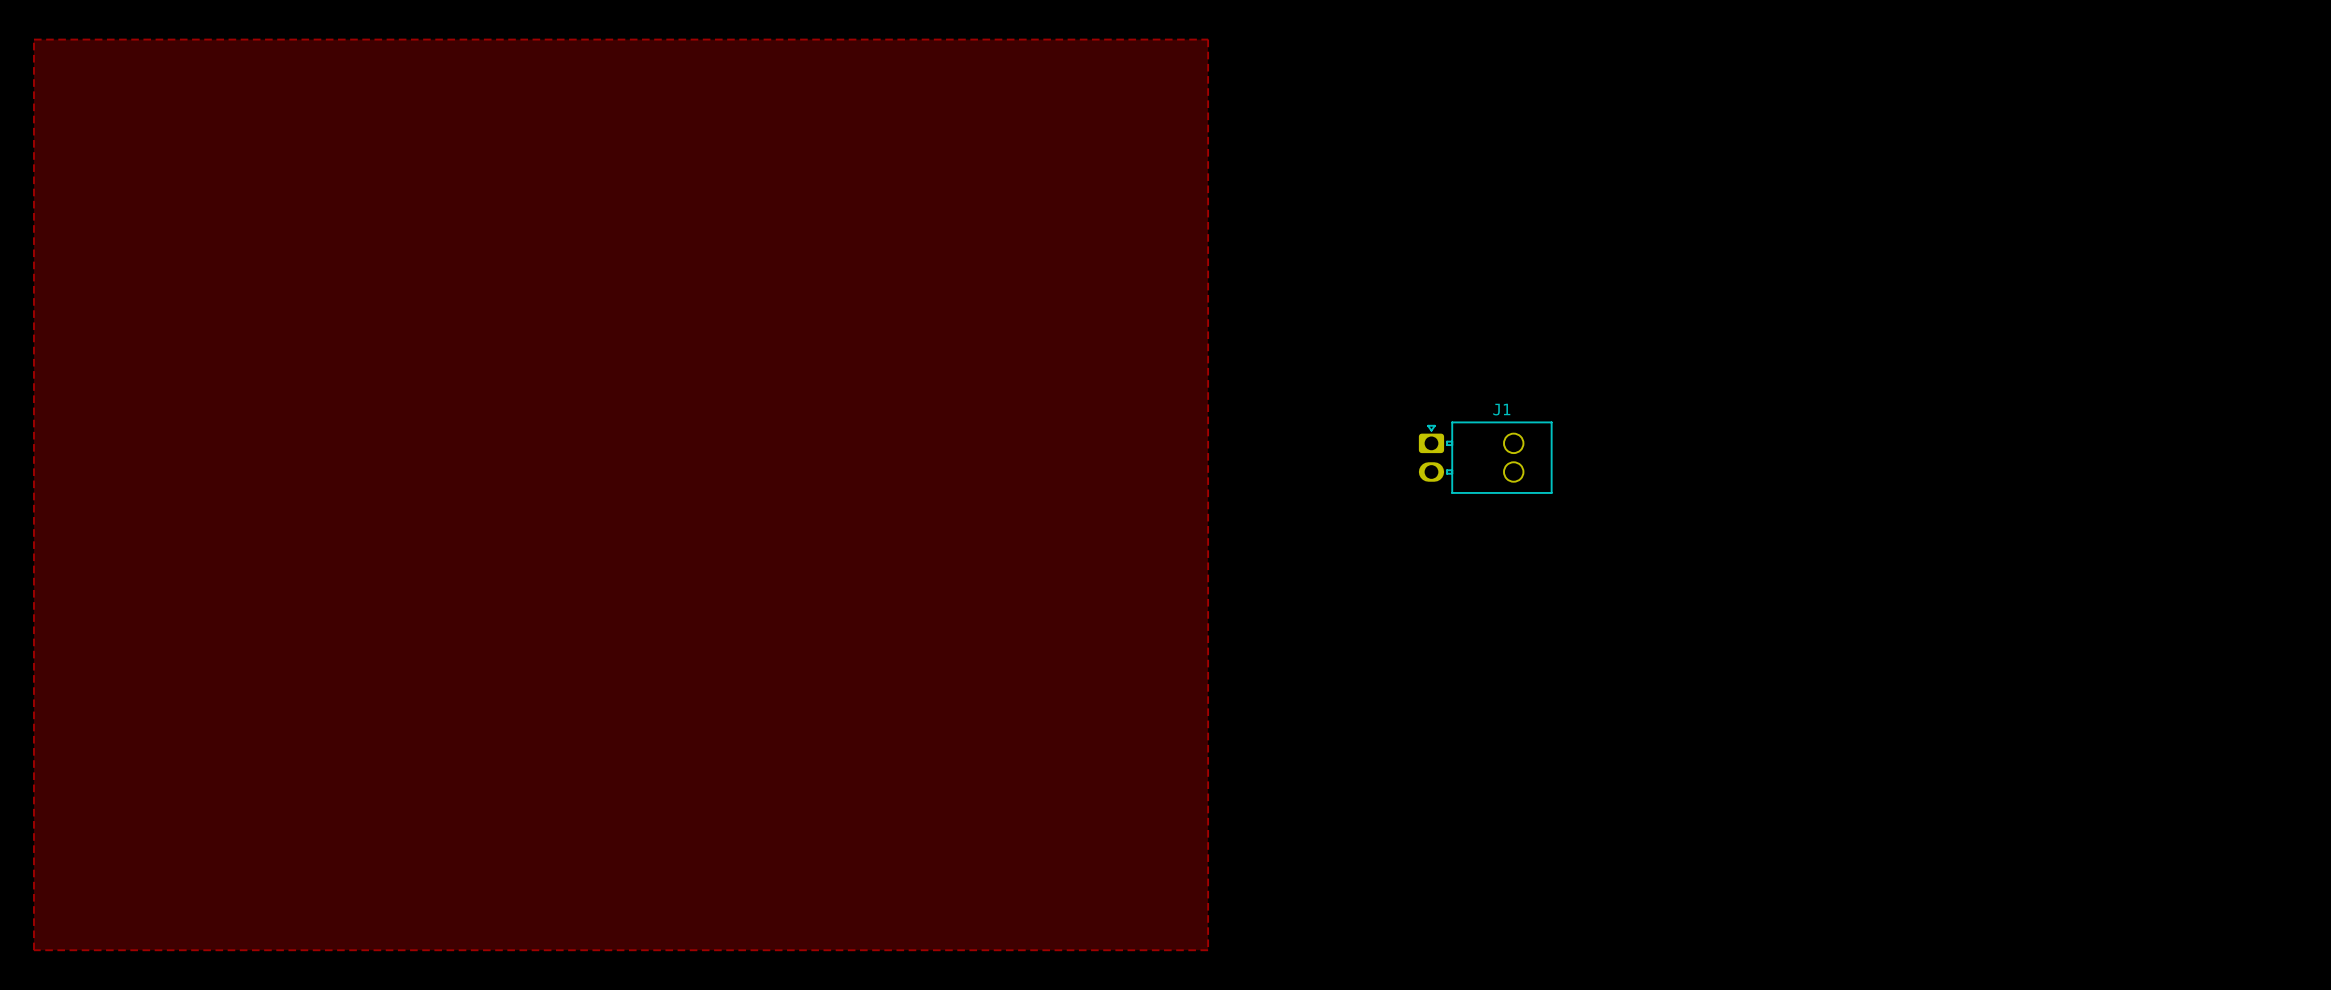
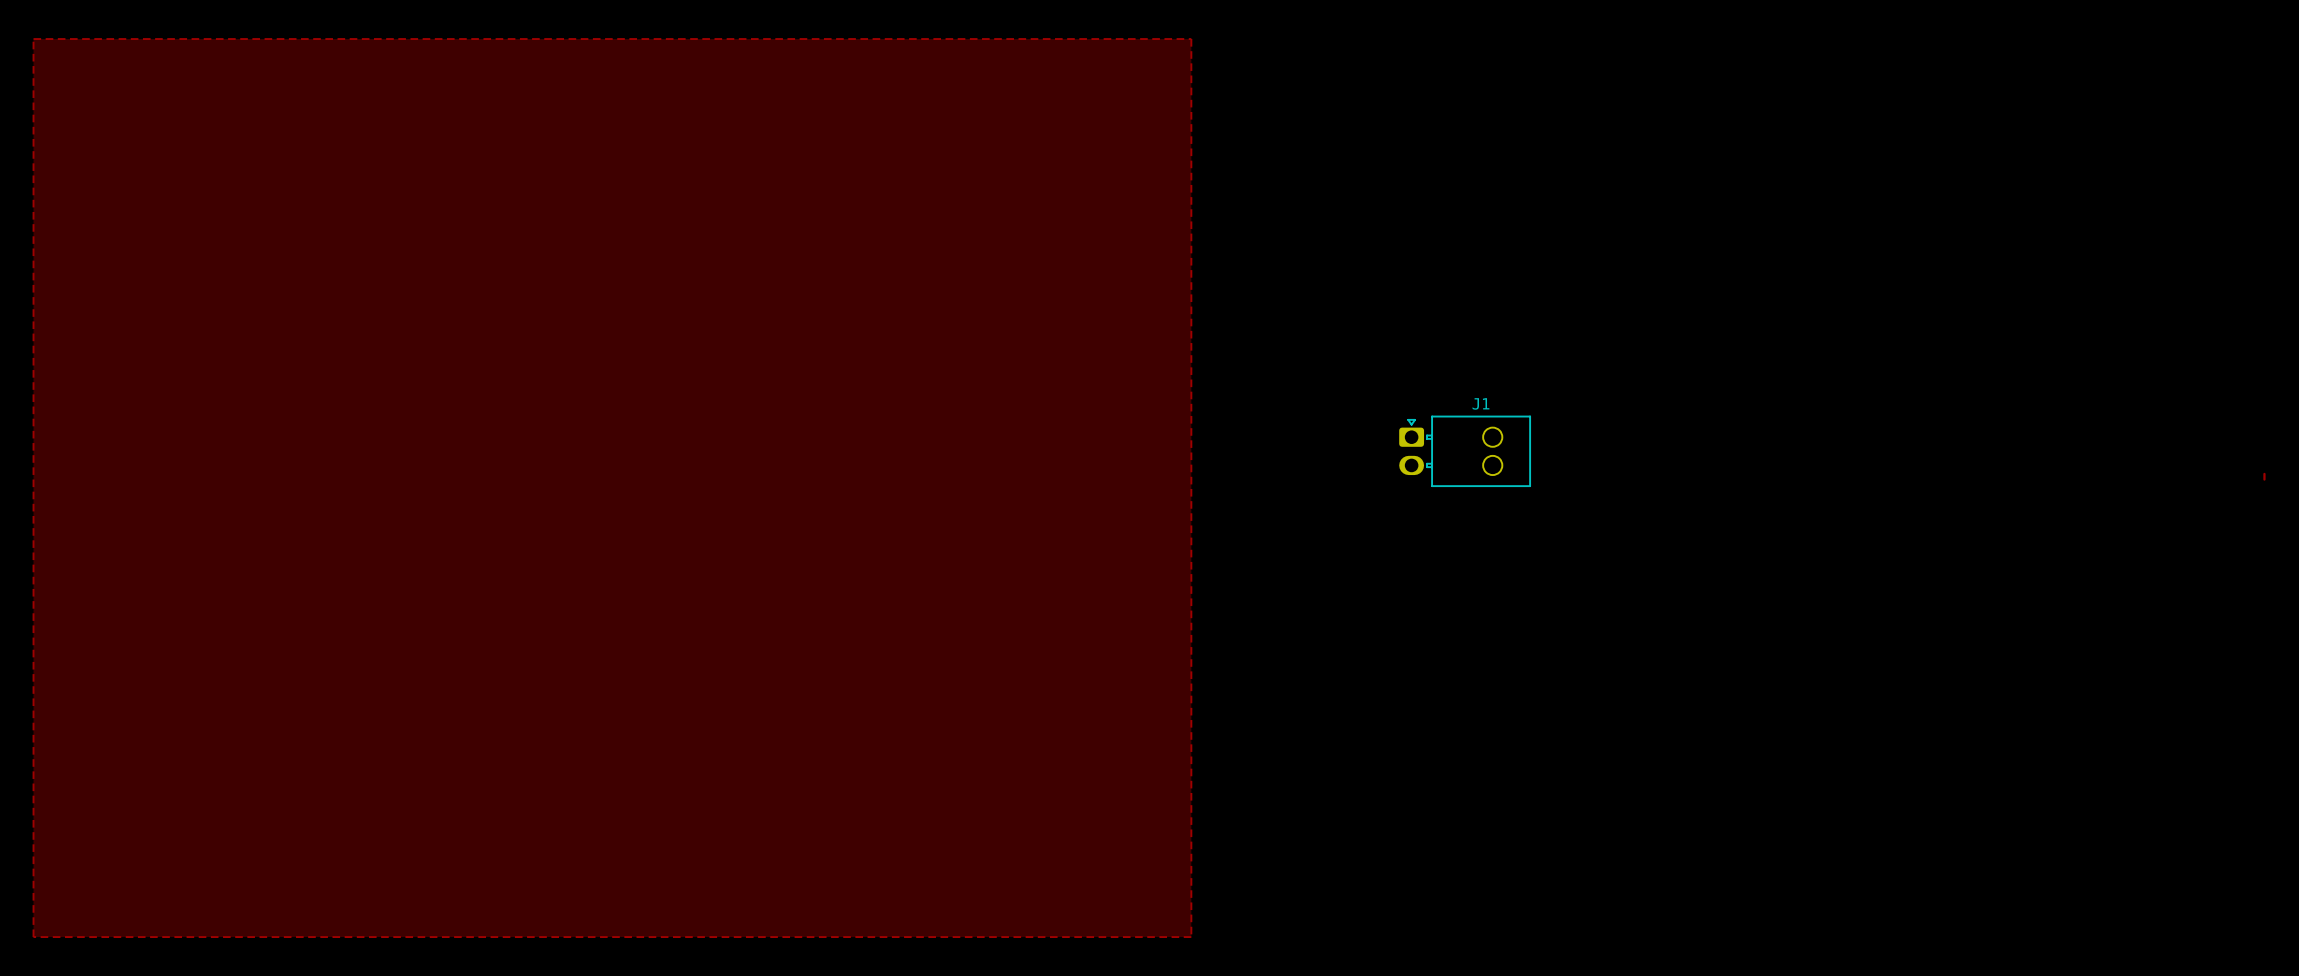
track: none -> (2264, 473) (2264, 479)

